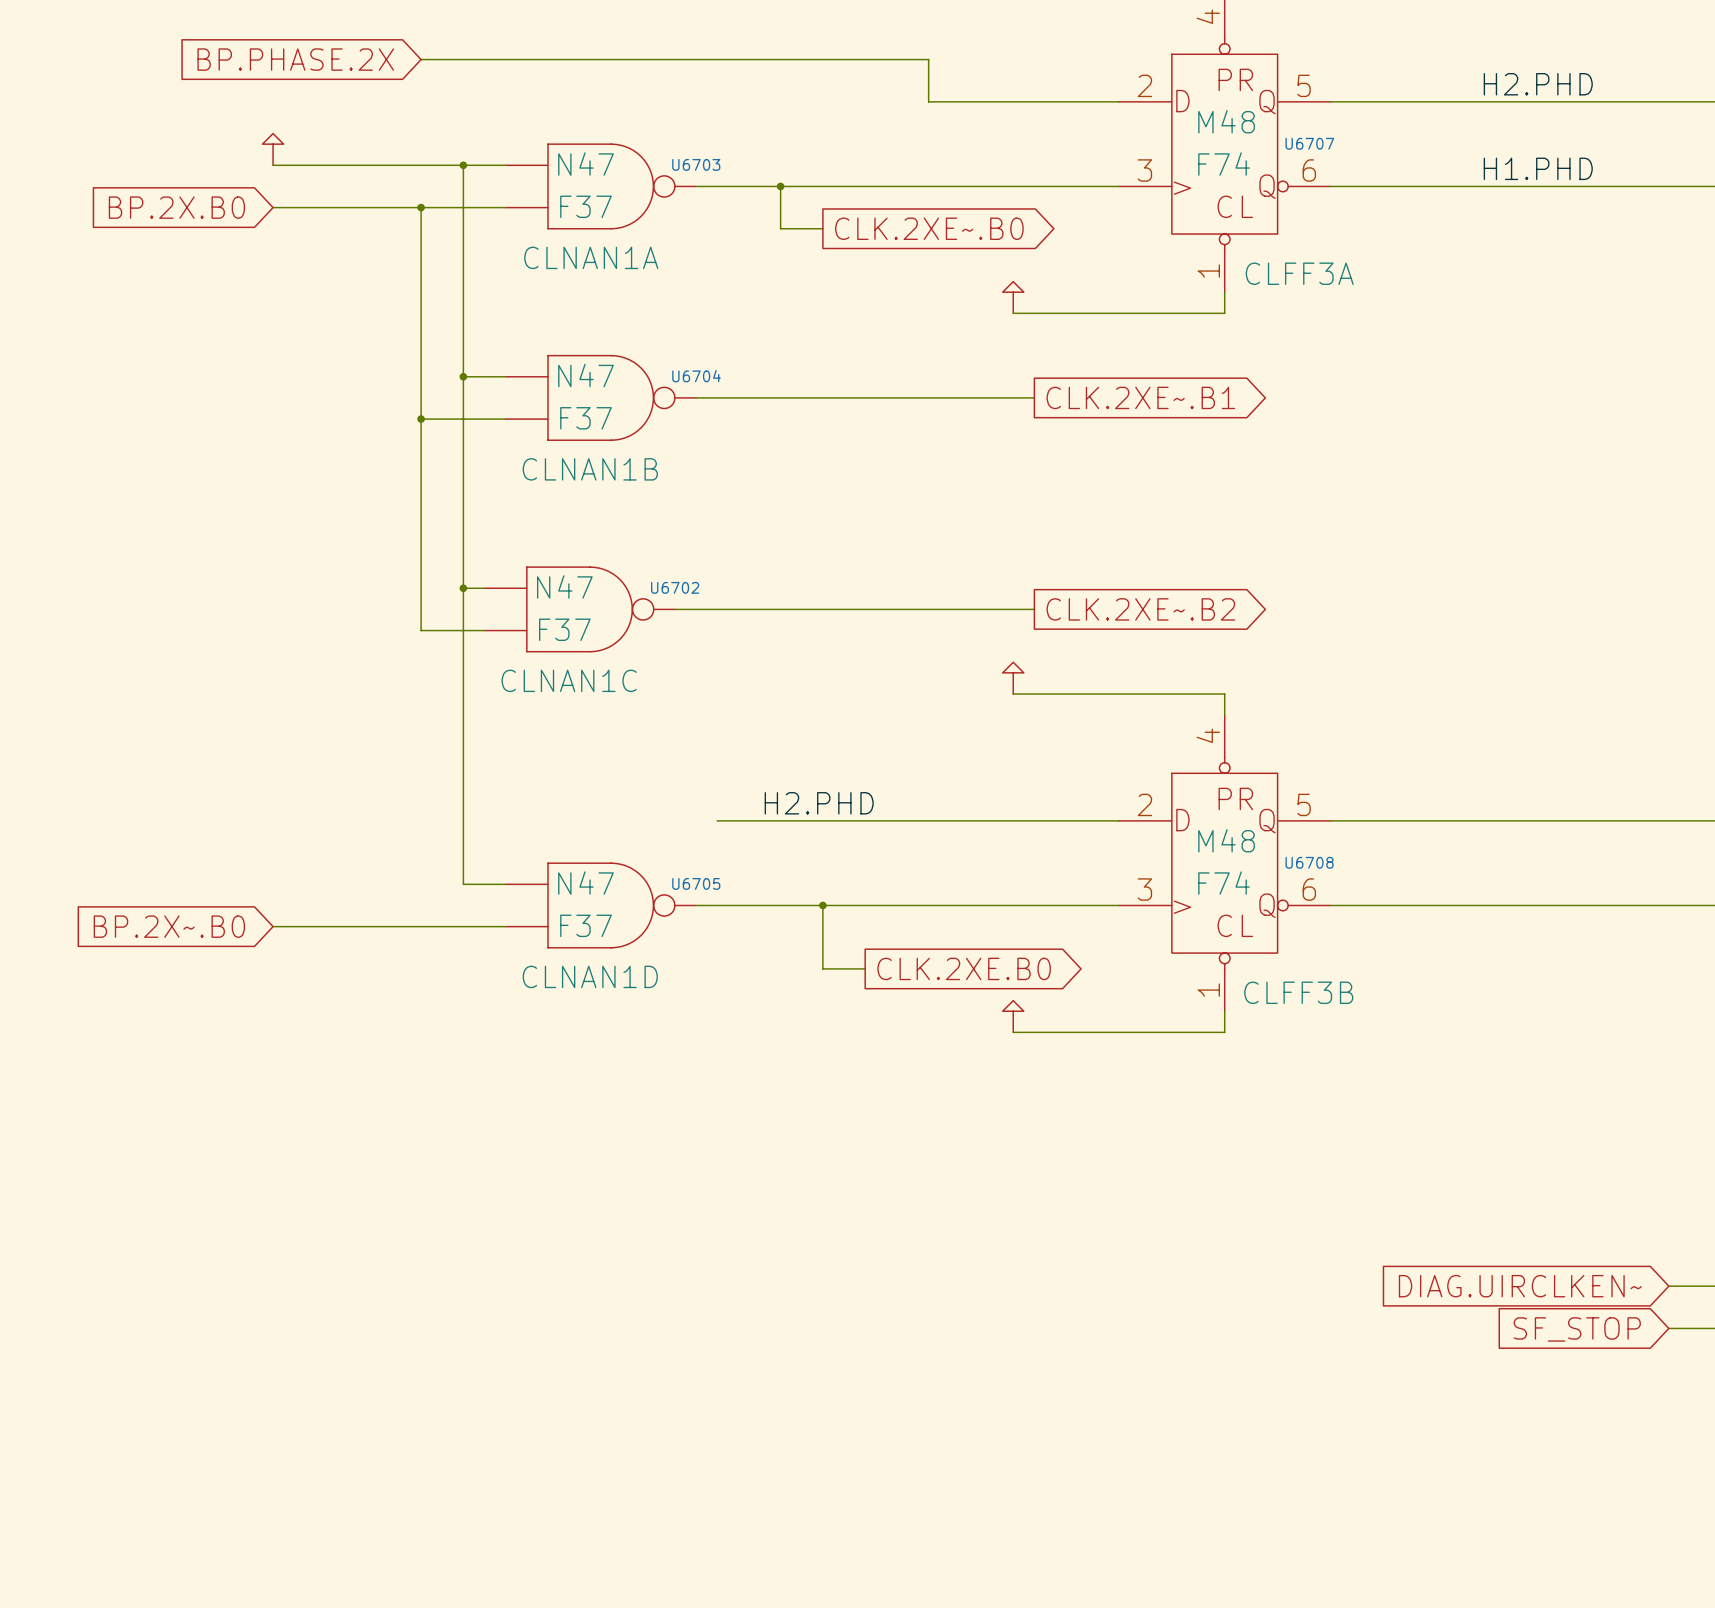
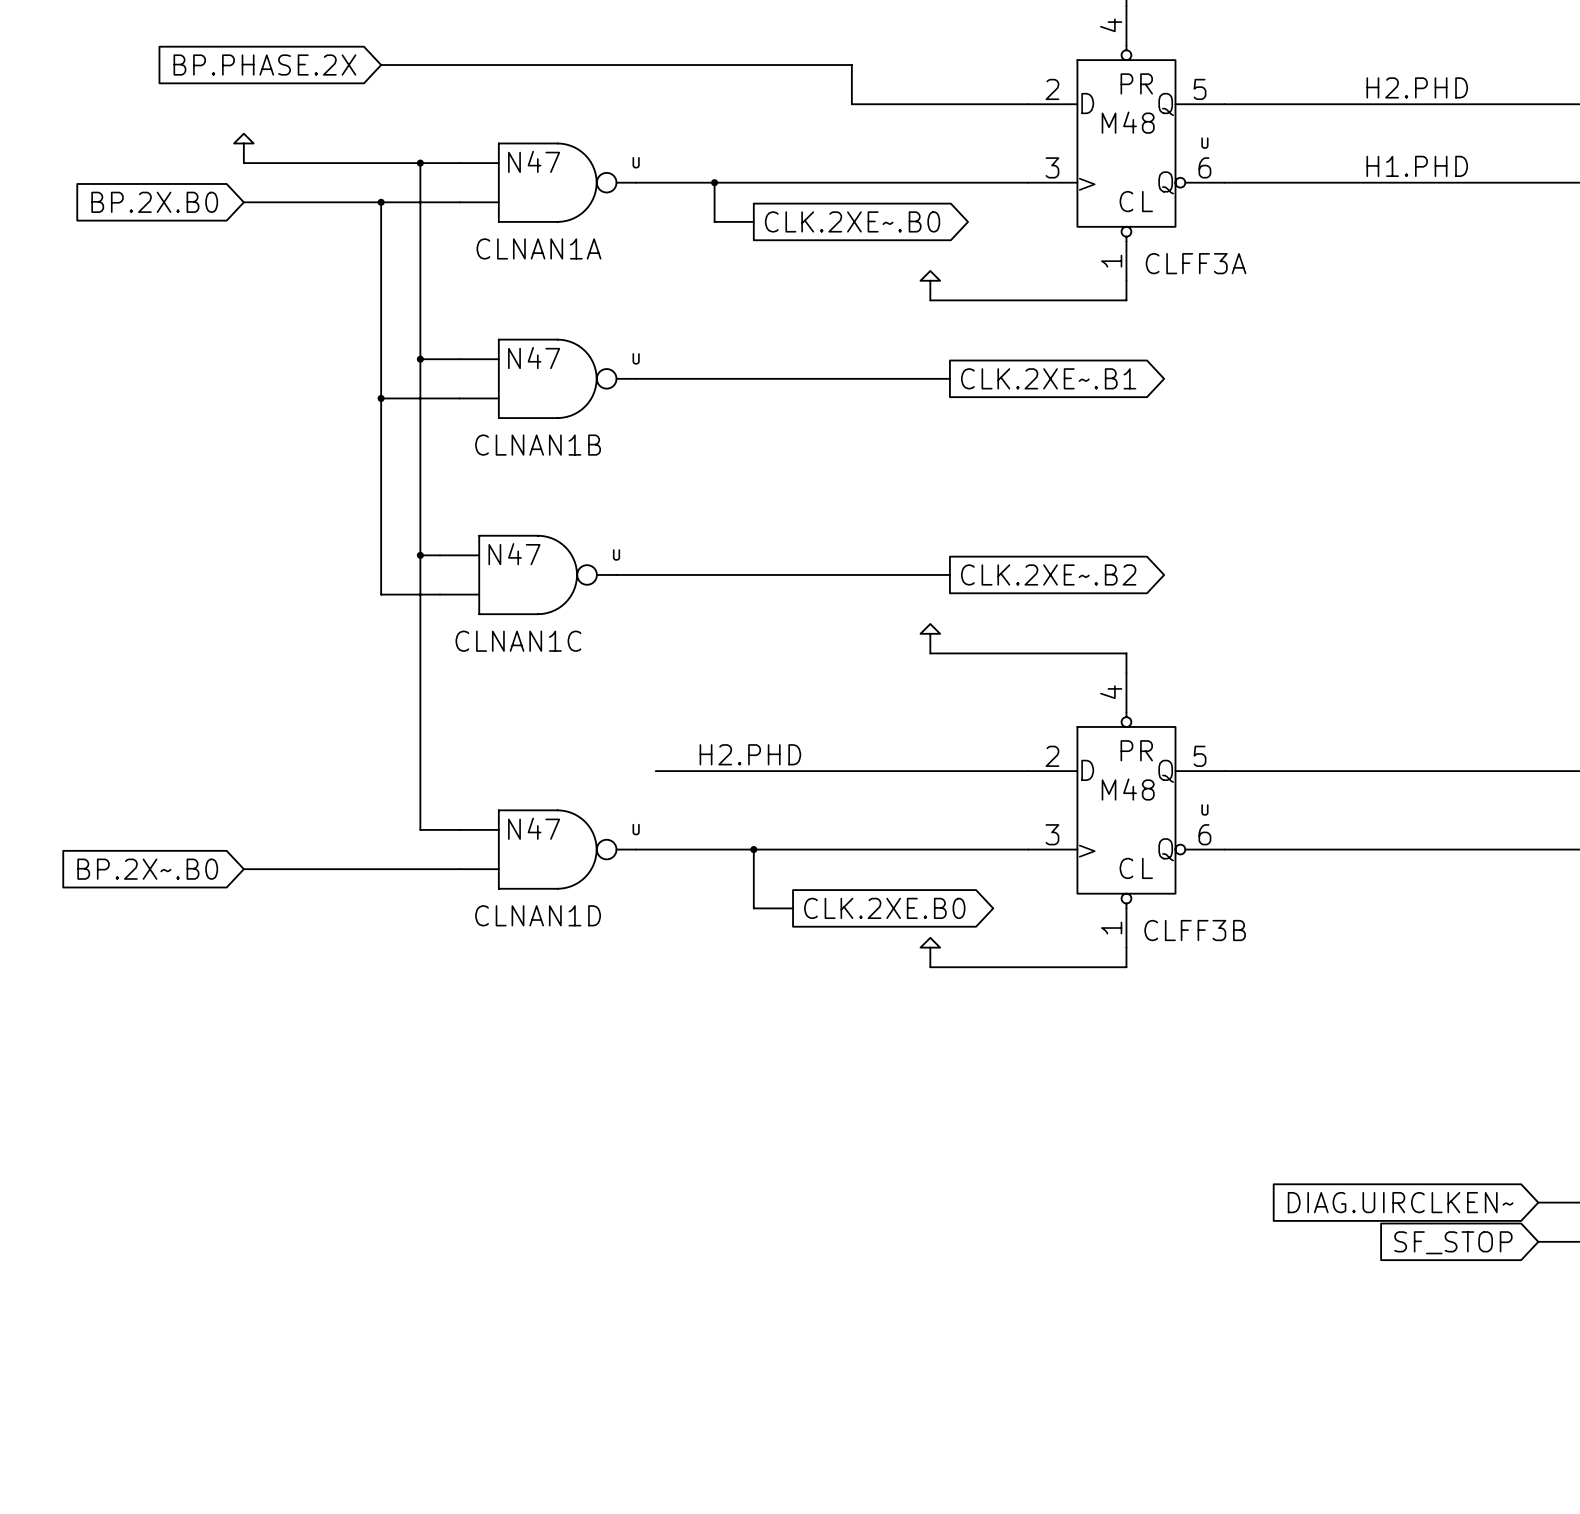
U6707 name: U6707 (1309, 143) -> U (1204, 143)
U6703 name: U6703 (696, 164) -> U (636, 162)
U6707 value: F74 (1224, 164) -> none
U6703 value: F37 (585, 206) -> none
U6704 name: U6704 (696, 376) -> U (636, 358)
U6704 value: F37 (585, 418) -> none
U6702 name: U6702 (675, 587) -> U (616, 554)
U6702 value: F37 (564, 629) -> none
U6708 name: U6708 (1309, 862) -> U (1204, 809)
U6705 name: U6705 (696, 883) -> U (636, 829)
U6708 value: F74 (1224, 883) -> none
U6705 value: F37 (585, 925) -> none

